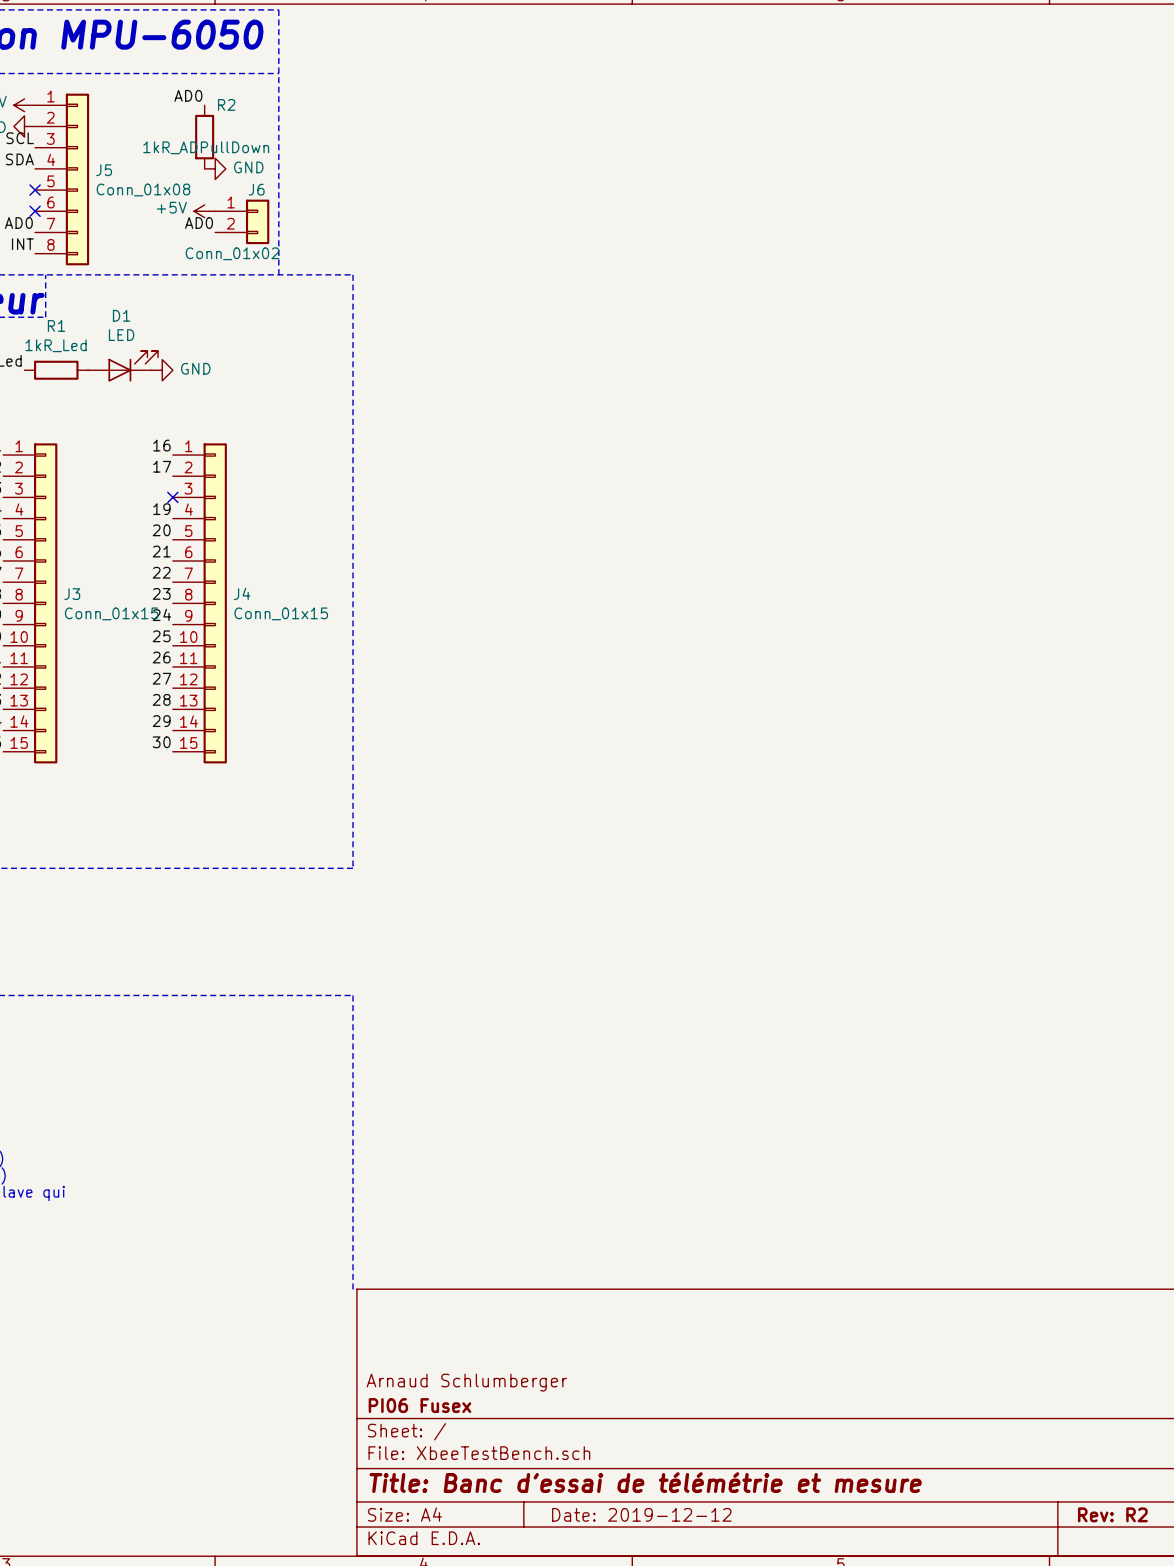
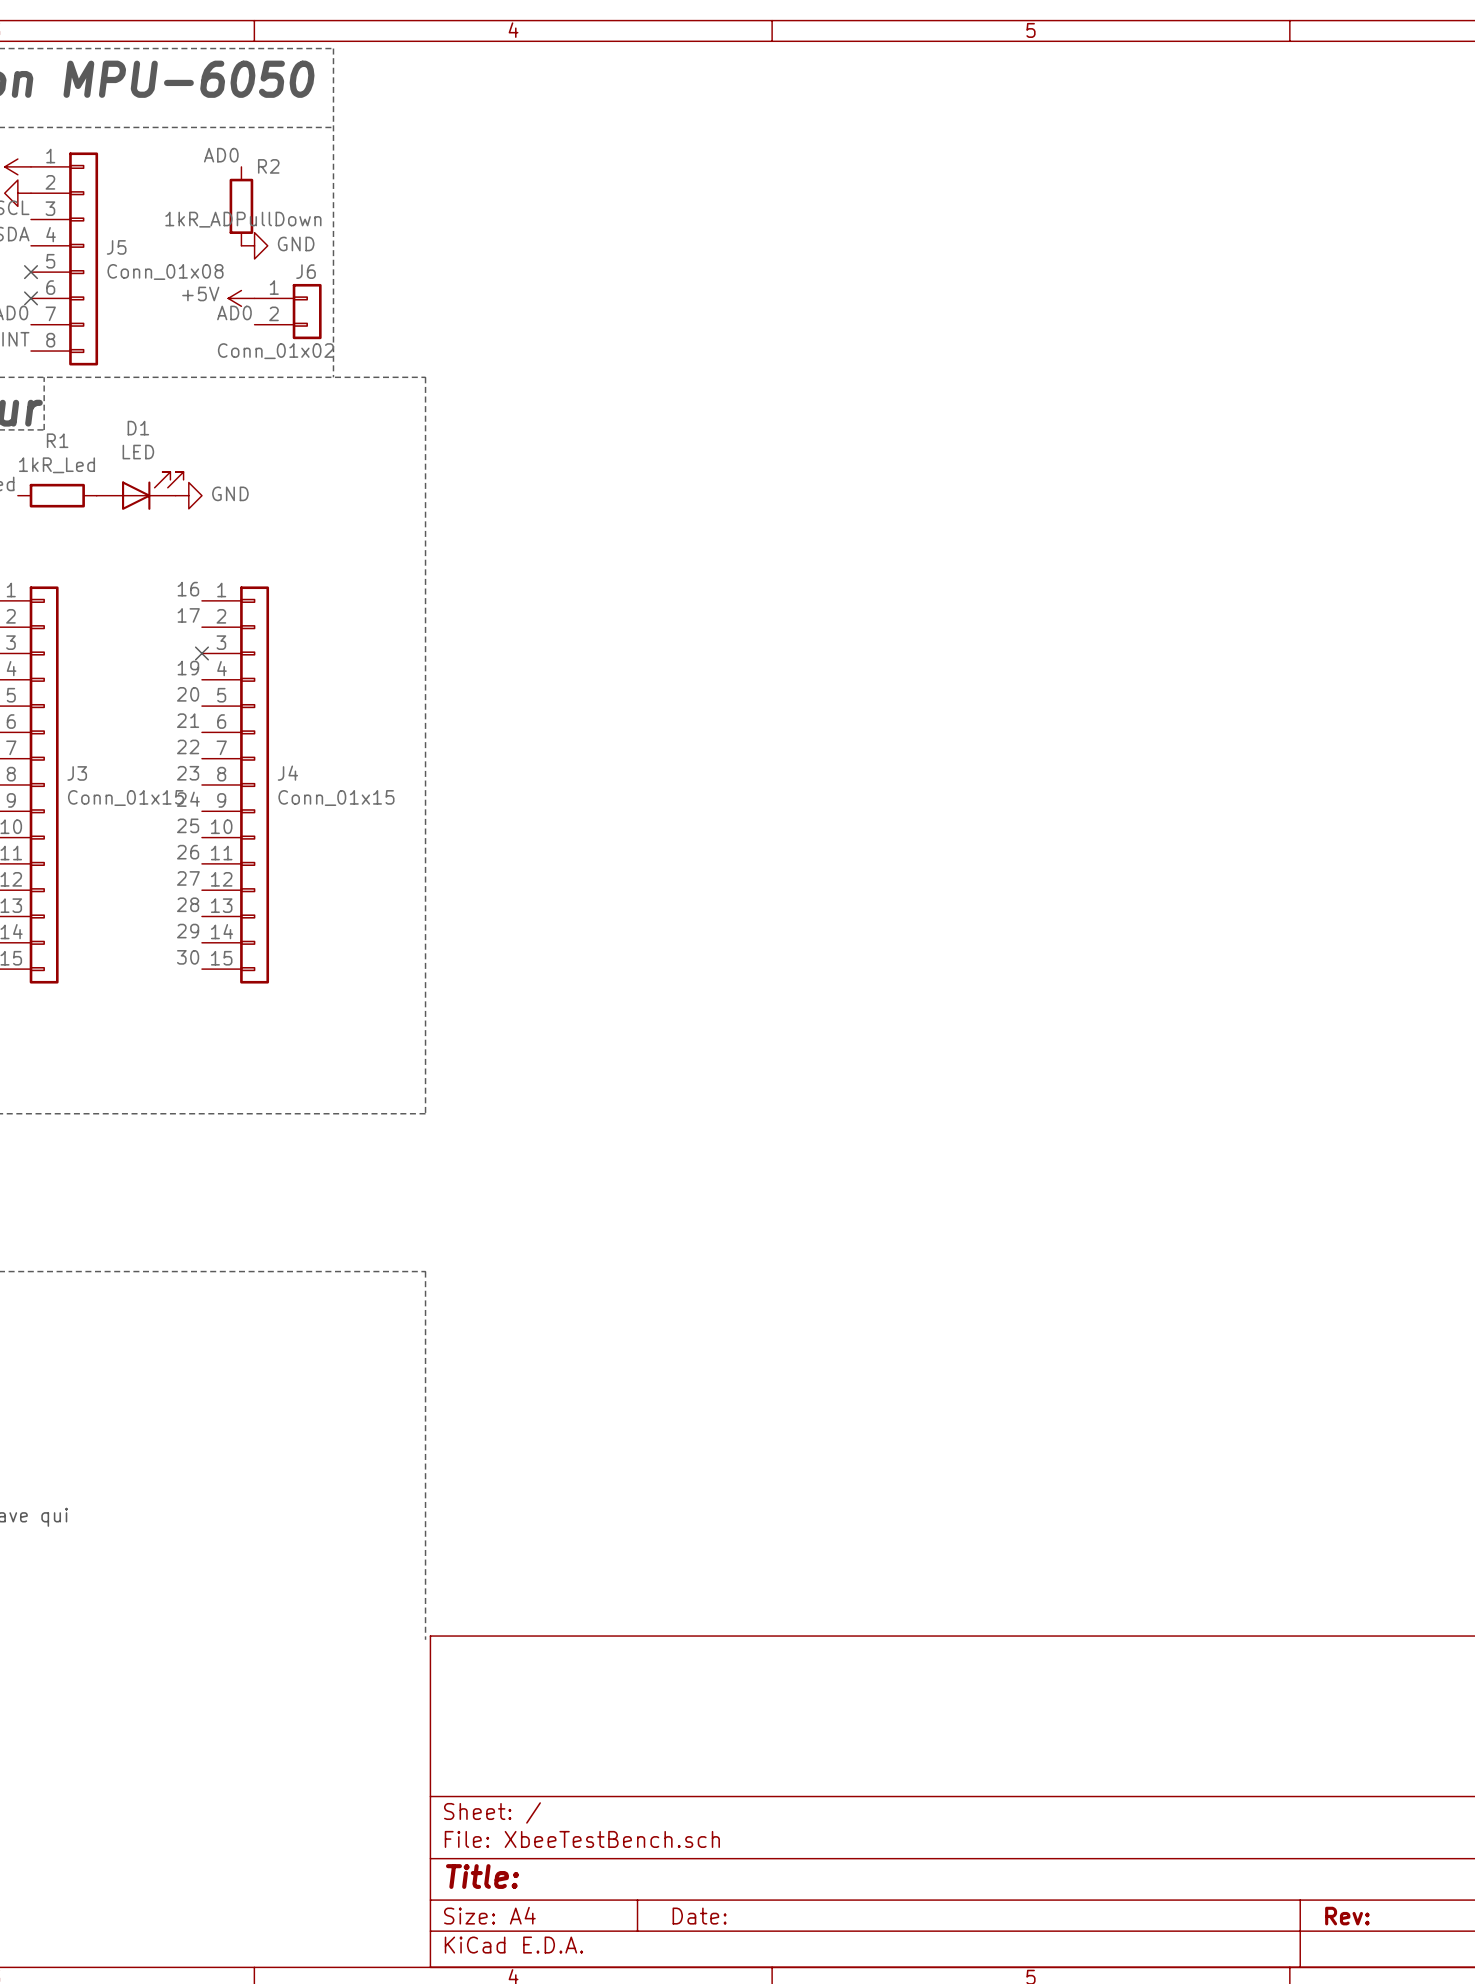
title block: Arnaud Schlumberger (466, 1382) -> none
title block: PI06 Fusex (419, 1405) -> none
title block: Title: Banc d'essai de télémétrie et mesure (645, 1482) -> Title: (482, 1876)
title block: Date: 2019-12-12 (641, 1514) -> Date: (699, 1916)
title block: Rev: R2 (1112, 1514) -> Rev: (1347, 1916)

